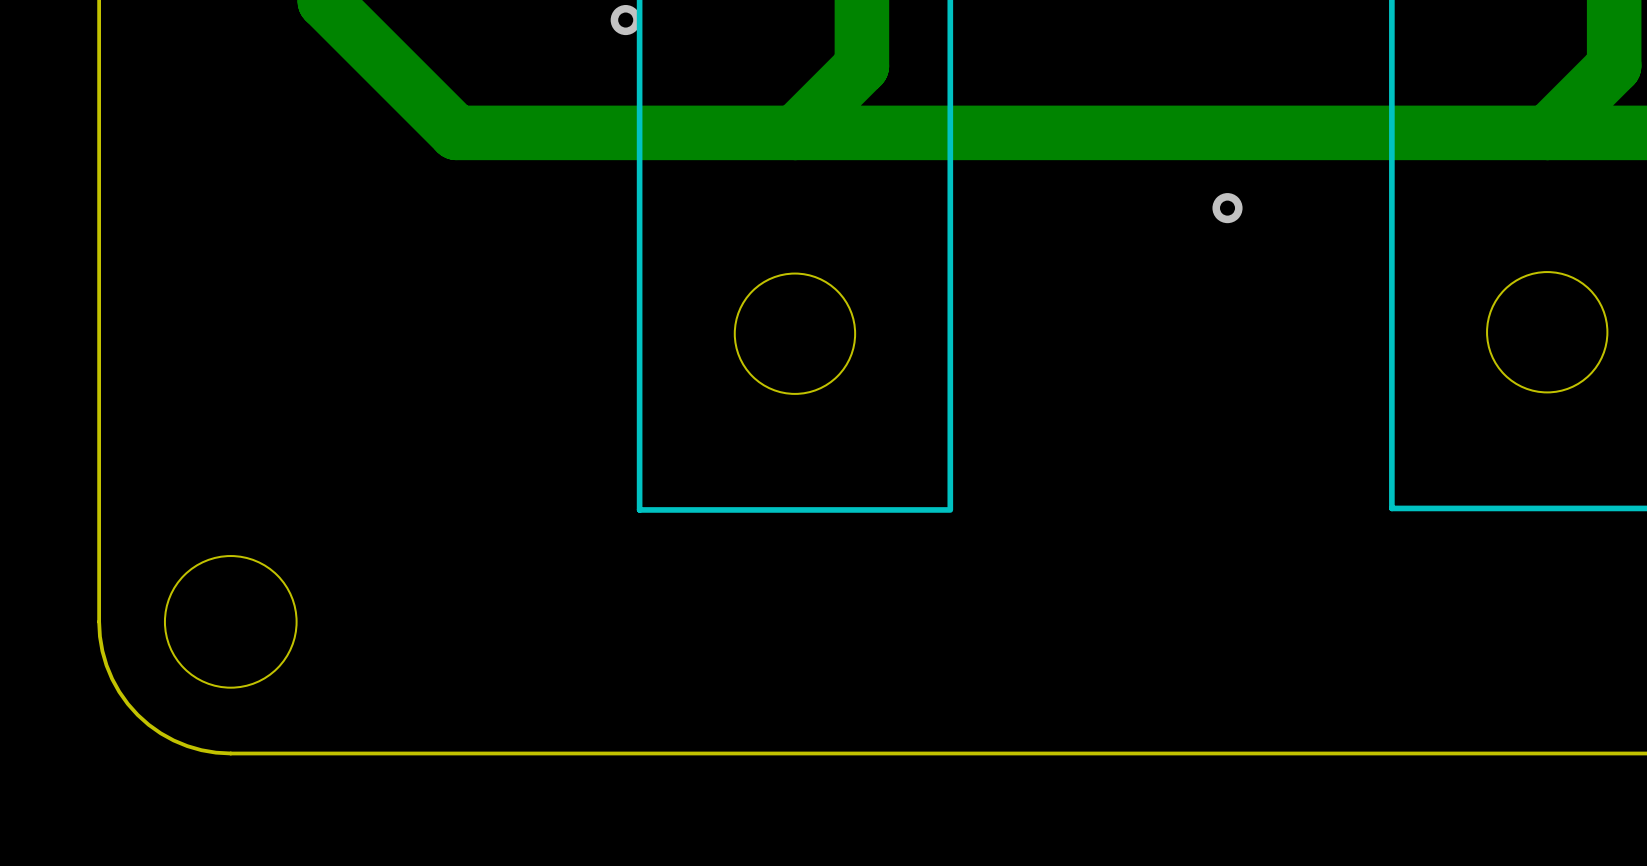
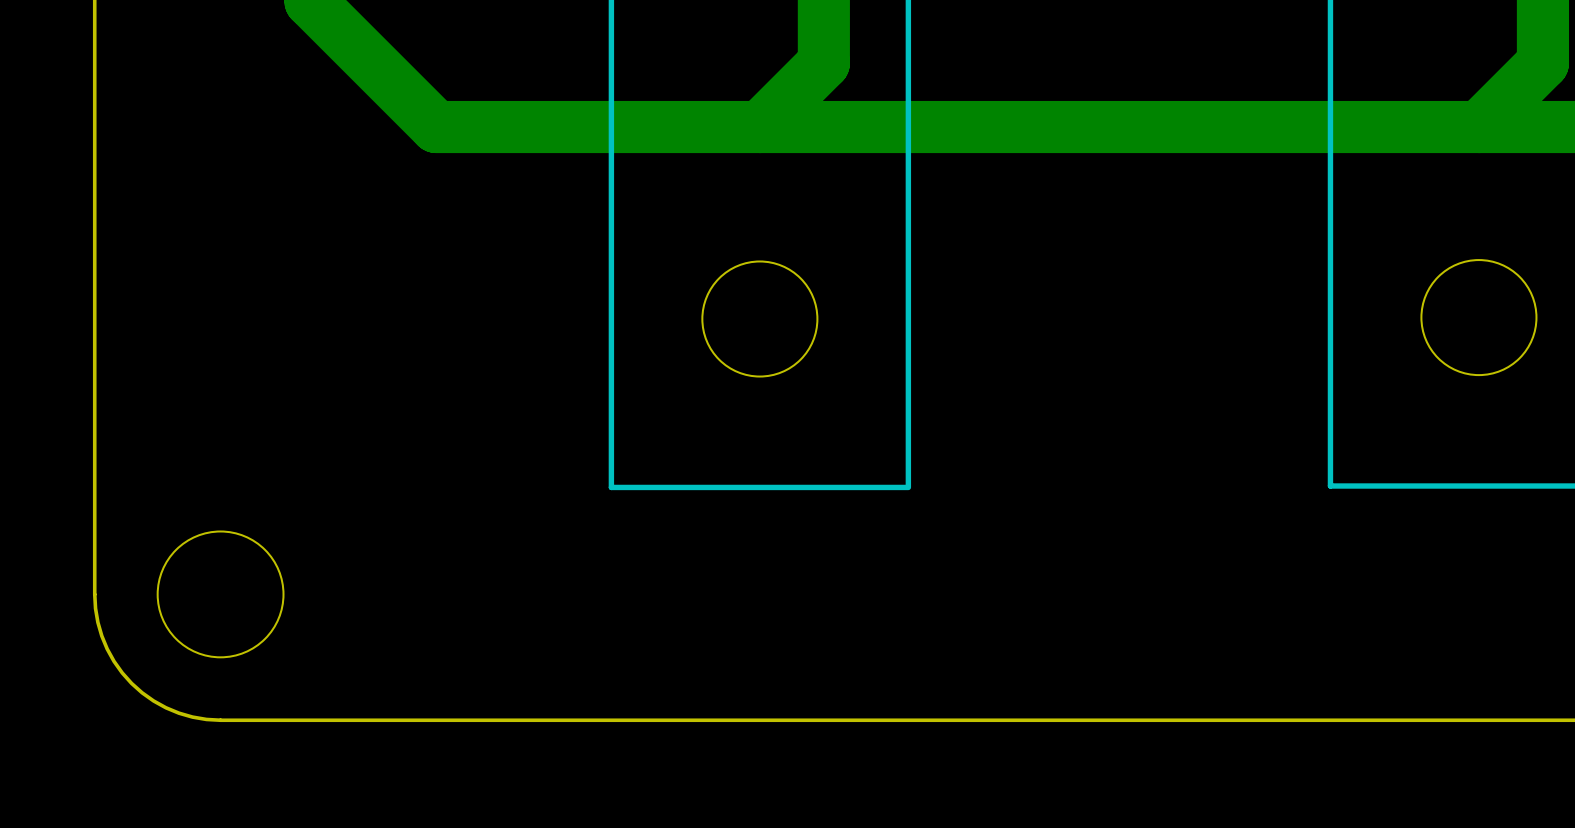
via: (625, 20) -> none
via: (1227, 208) -> none

